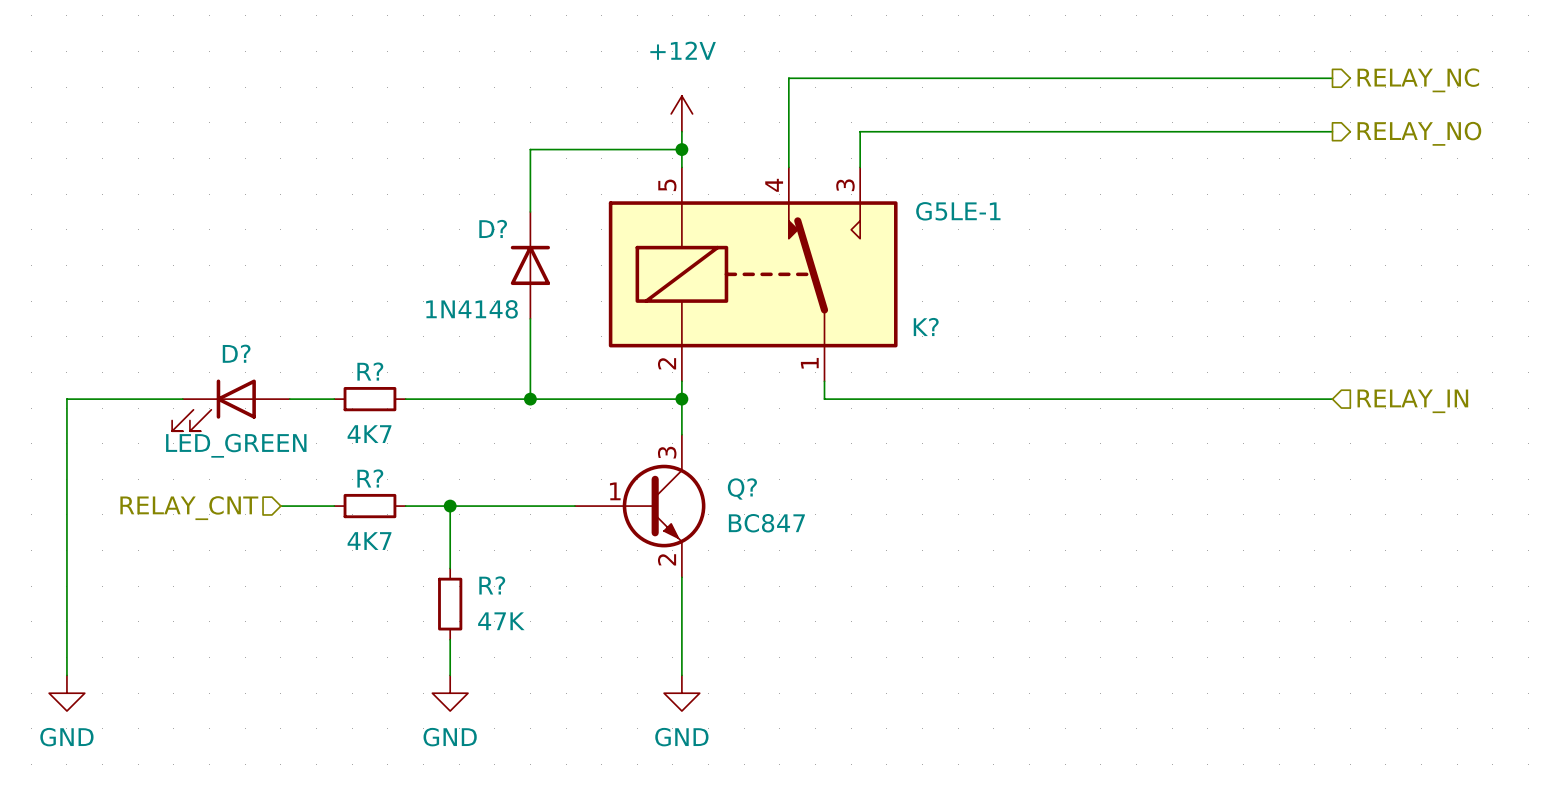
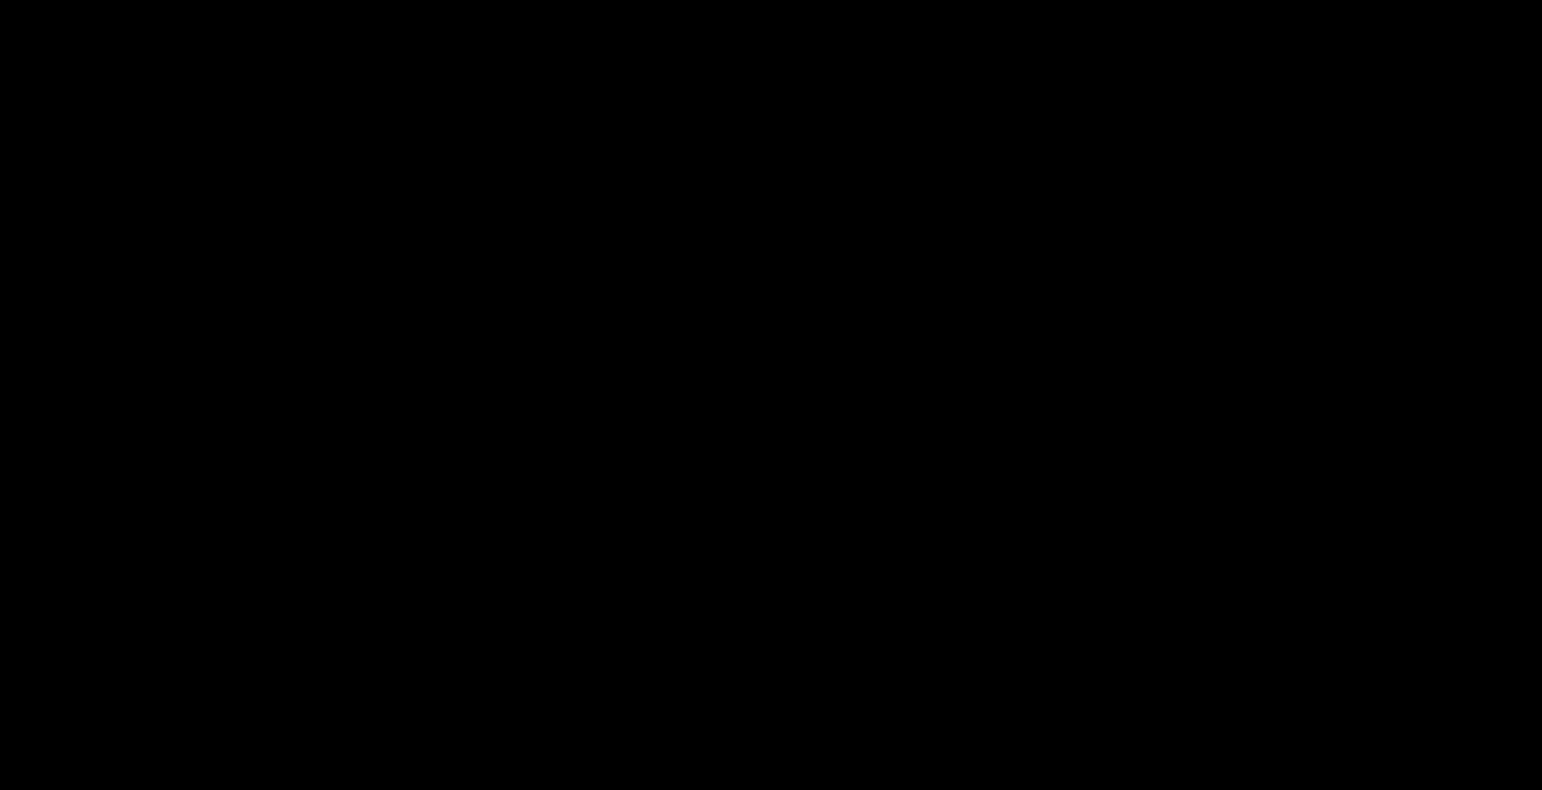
wire: (1332, 78) (788, 78) (788, 167) -> none
hierarchical label: RELAY_NC (1418, 80) -> none
power symbol: +12V (681, 113) -> none
wire: (681, 131) (681, 167) -> none
wire: (1332, 131) (860, 131) (860, 167) -> none
hierarchical label: RELAY_NO (1419, 133) -> none
wire: (681, 149) (530, 149) (530, 211) -> none
junction: (681, 149) -> none
D?: 1N4148 (530, 265) -> none
K?: G5LE-1 (753, 274) -> none
wire: (530, 318) (530, 399) -> none
wire: (681, 381) (681, 434) -> none
wire: (824, 381) (824, 399) (1332, 399) -> none
wire: (182, 399) (66, 399) (66, 675) -> none
wire: (289, 399) (334, 399) -> none
R?: 4K7 (369, 399) -> none
wire: (405, 399) (681, 399) -> none
junction: (530, 399) -> none
junction: (681, 399) -> none
hierarchical label: RELAY_IN (1412, 401) -> none
D?: LED_GREEN (230, 405) -> none
wire: (280, 506) (334, 506) -> none
R?: 4K7 (369, 506) -> none
wire: (405, 506) (574, 506) -> none
wire: (450, 506) (450, 568) -> none
junction: (450, 506) -> none
Q?: BC847 (640, 506) -> none
hierarchical label: RELAY_CNT (189, 508) -> none
wire: (681, 577) (681, 675) -> none
R?: 47K (450, 604) -> none
wire: (450, 639) (450, 675) -> none
power symbol: GND (66, 693) -> none
power symbol: GND (450, 693) -> none
power symbol: GND (681, 693) -> none

